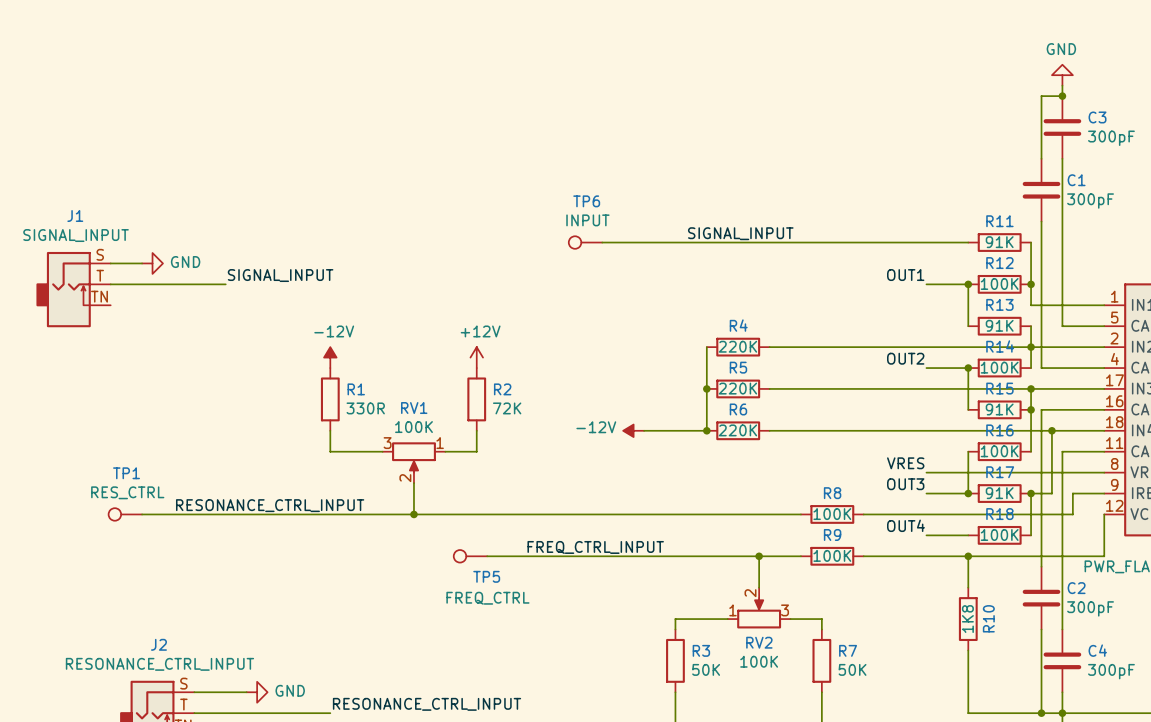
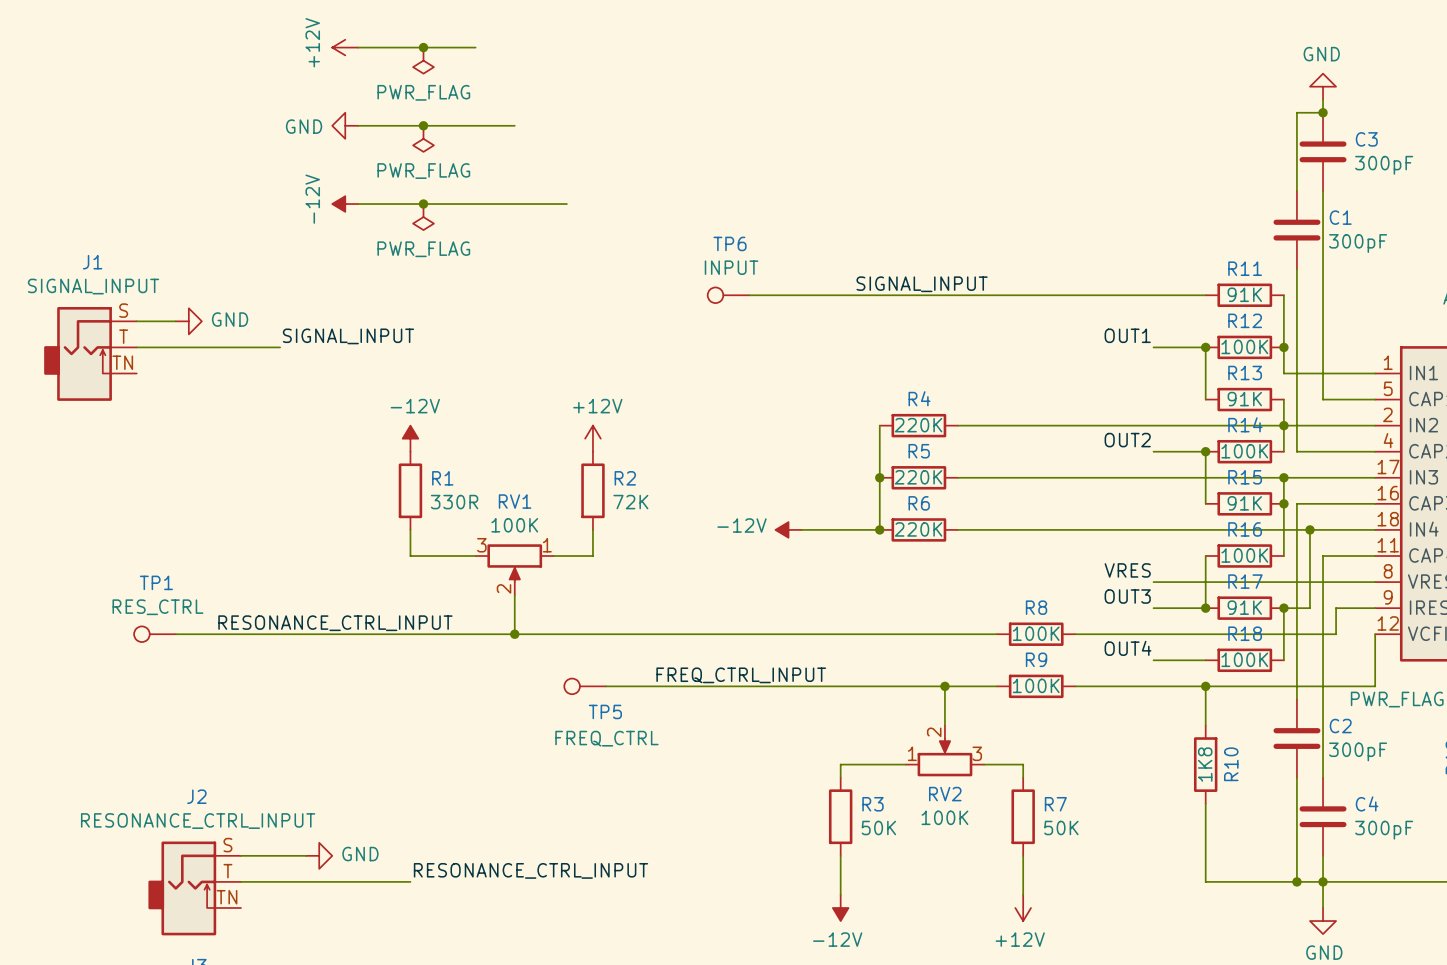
power symbol: none -> +12V (345, 47)
wire: none -> (358, 47) (475, 47)
junction: none -> (423, 47)
power symbol: none -> PWR_FLAG (423, 60)
power symbol: none -> GND (345, 125)
wire: none -> (358, 125) (514, 125)
junction: none -> (423, 125)
power symbol: none -> PWR_FLAG (423, 138)
power symbol: none -> -12V (345, 204)
wire: none -> (358, 204) (566, 204)
junction: none -> (423, 204)
power symbol: none -> PWR_FLAG (423, 217)

